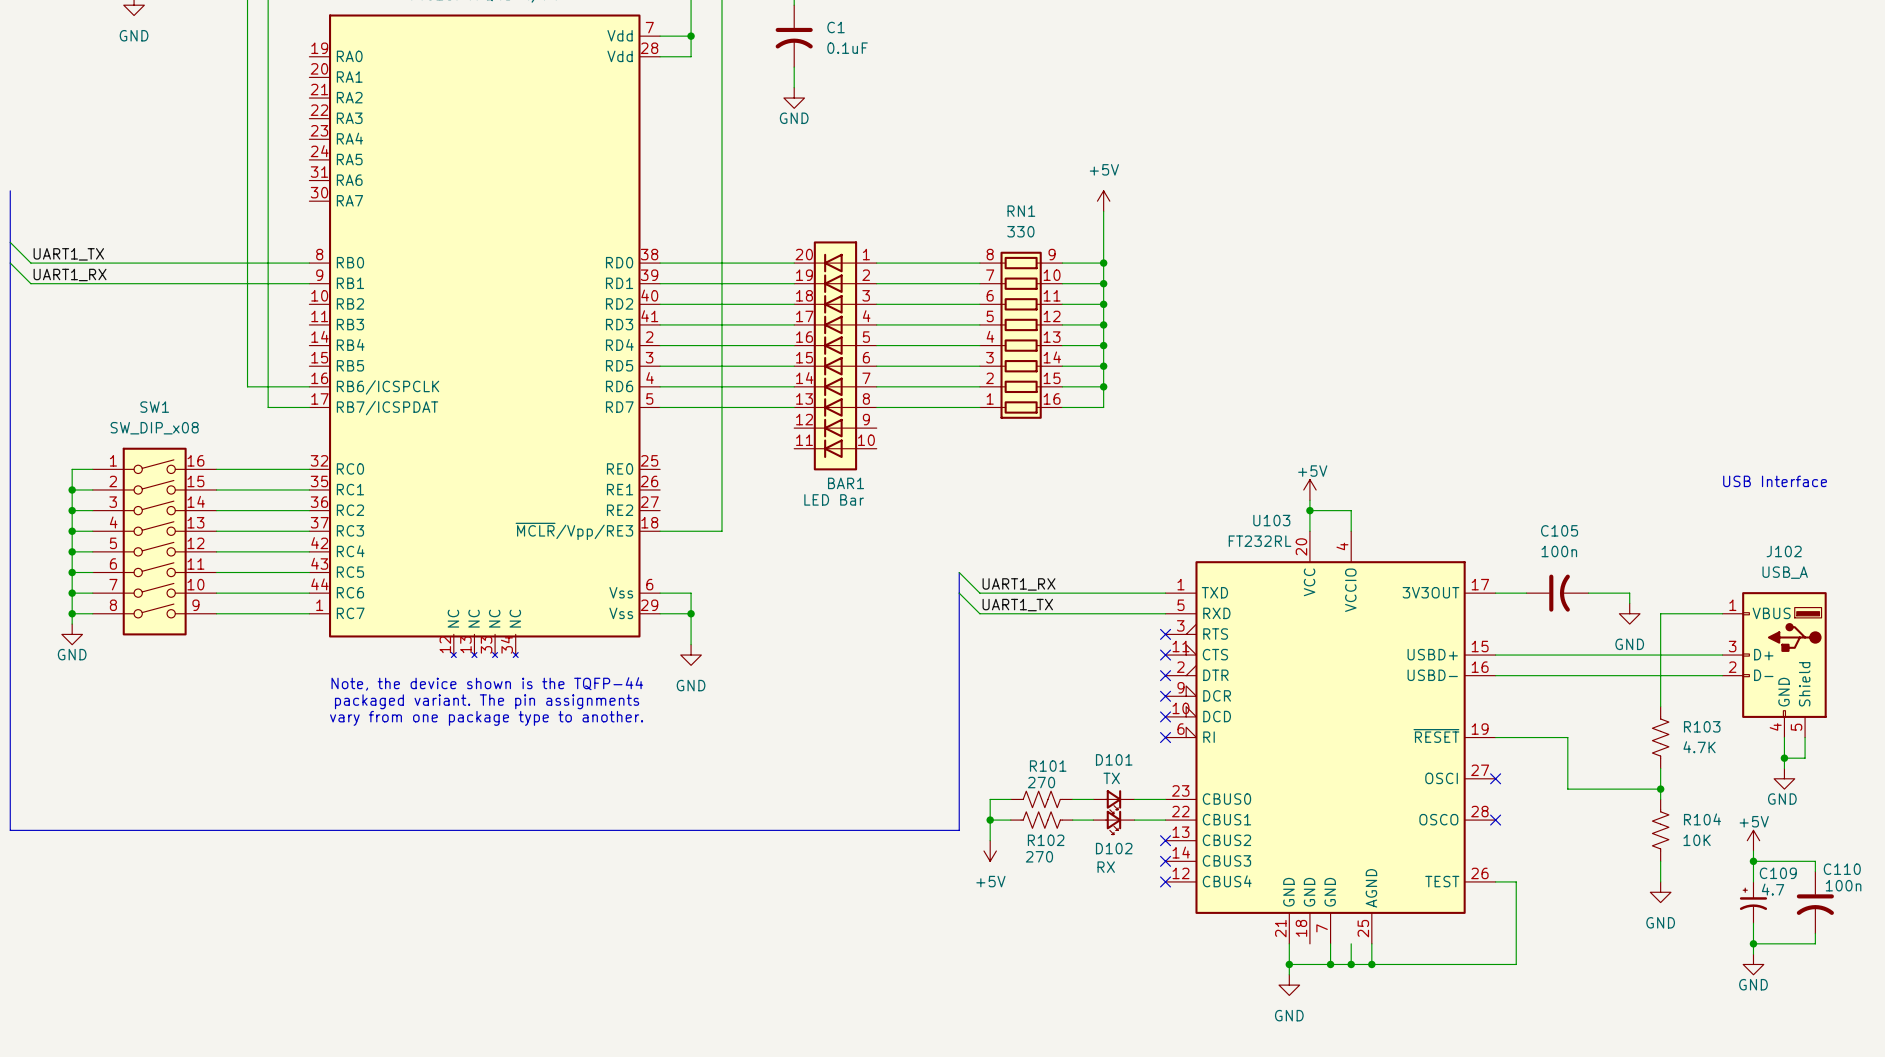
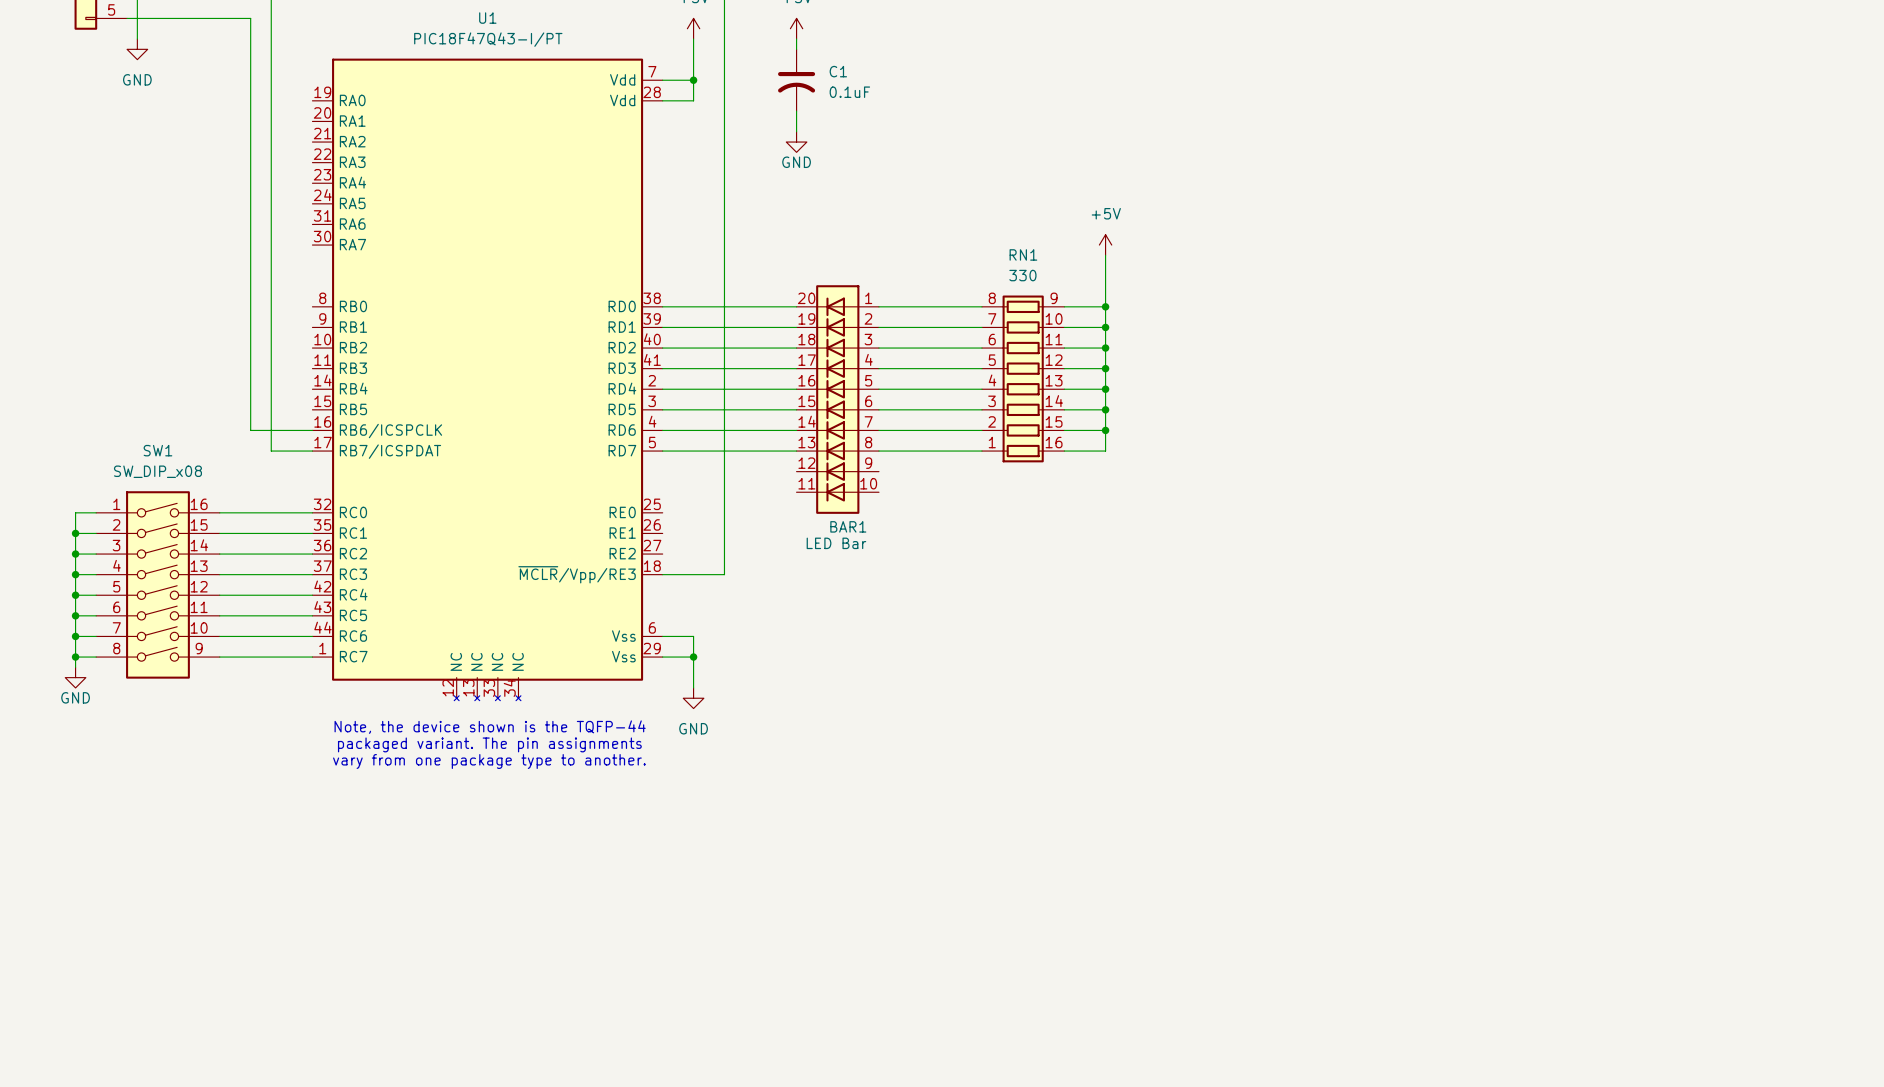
bus: (10, 190) (10, 830) (959, 830) (959, 572) -> none
wire: (10, 242) (30, 263) (309, 263) -> none
label: UART1_TX (68, 254) -> none
wire: (10, 263) (30, 283) (309, 283) -> none
label: UART1_RX (70, 274) -> none
text: USB Interface (1775, 481) -> none
power symbol: +5V (1309, 489) -> none
wire: (1309, 500) (1309, 531) -> none
wire: (1309, 510) (1351, 510) (1351, 531) -> none
junction: (1309, 510) -> none
wire: (959, 572) (979, 593) (1165, 593) -> none
label: UART1_RX (1018, 584) -> none
wire: (959, 593) (979, 613) (1165, 613) -> none
wire: (1495, 593) (1526, 593) -> none
C105: 100n (1557, 593) -> none
wire: (1588, 593) (1629, 593) (1629, 603) -> none
label: UART1_TX (1017, 605) -> none
power symbol: GND (1629, 613) -> none
wire: (1722, 613) (1660, 613) (1660, 706) -> none
no-connect mark: (1165, 634) -> none
no-connect mark: (1165, 655) -> none
wire: (1495, 655) (1722, 655) -> none
J102: USB_A (1774, 664) -> none
no-connect mark: (1165, 675) -> none
wire: (1495, 675) (1722, 675) -> none
no-connect mark: (1165, 696) -> none
no-connect mark: (1165, 716) -> none
no-connect mark: (1165, 737) -> none
U103: FT232RL (1330, 737) -> none
wire: (1495, 737) (1567, 737) (1567, 789) (1660, 789) -> none
R103: 4.7K (1660, 737) -> none
wire: (1784, 737) (1784, 768) -> none
wire: (1805, 737) (1805, 758) (1784, 758) -> none
junction: (1784, 758) -> none
wire: (1660, 768) (1660, 799) -> none
no-connect mark: (1495, 778) -> none
power symbol: GND (1784, 778) -> none
junction: (1660, 789) -> none
wire: (1010, 799) (990, 799) (990, 840) -> none
R101: 270 (1041, 799) -> none
wire: (1072, 799) (1093, 799) -> none
wire: (1134, 799) (1165, 799) -> none
D101: TX (1113, 802) -> none
wire: (990, 820) (1010, 820) -> none
junction: (990, 820) -> none
R102: 270 (1041, 820) -> none
wire: (1072, 820) (1093, 820) -> none
wire: (1134, 820) (1165, 820) -> none
no-connect mark: (1495, 820) -> none
D102: RX (1113, 822) -> none
R104: 10K (1660, 830) -> none
no-connect mark: (1165, 840) -> none
power symbol: +5V (1753, 840) -> none
power symbol: +5V (990, 851) -> none
wire: (1753, 851) (1753, 881) -> none
no-connect mark: (1165, 861) -> none
wire: (1660, 861) (1660, 881) -> none
wire: (1753, 861) (1815, 861) (1815, 871) -> none
junction: (1753, 861) -> none
no-connect mark: (1165, 881) -> none
wire: (1495, 881) (1516, 881) (1516, 964) (1289, 964) -> none
power symbol: GND (1660, 892) -> none
C109: 4.7 (1753, 902) -> none
C110: 100n (1815, 902) -> none
wire: (1753, 923) (1753, 954) -> none
wire: (1815, 933) (1815, 943) (1753, 943) -> none
wire: (1289, 943) (1289, 974) -> none
wire: (1330, 943) (1330, 964) -> none
wire: (1351, 943) (1351, 964) -> none
wire: (1371, 943) (1371, 964) -> none
junction: (1753, 943) -> none
junction: (1289, 964) -> none
junction: (1330, 964) -> none
junction: (1351, 964) -> none
junction: (1371, 964) -> none
power symbol: GND (1753, 964) -> none
power symbol: GND (1289, 985) -> none

